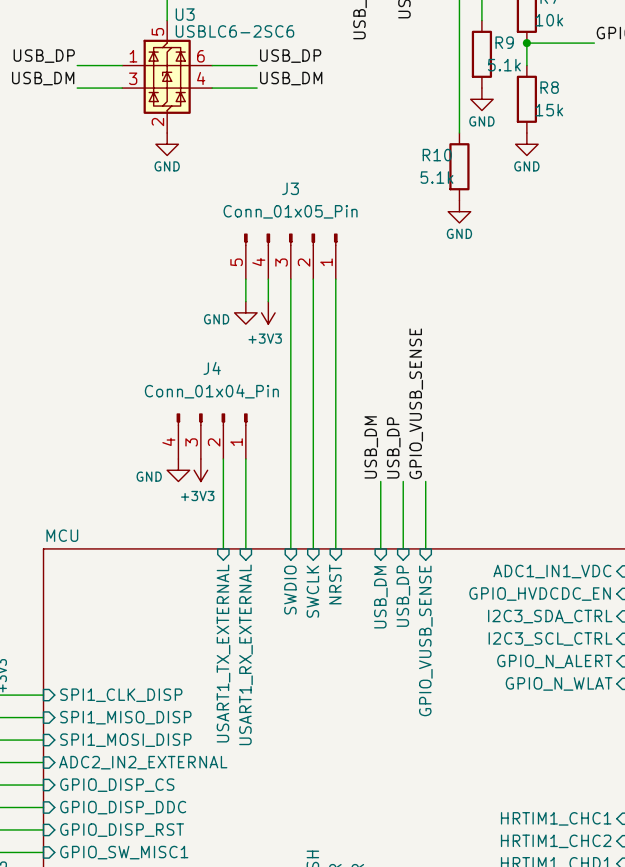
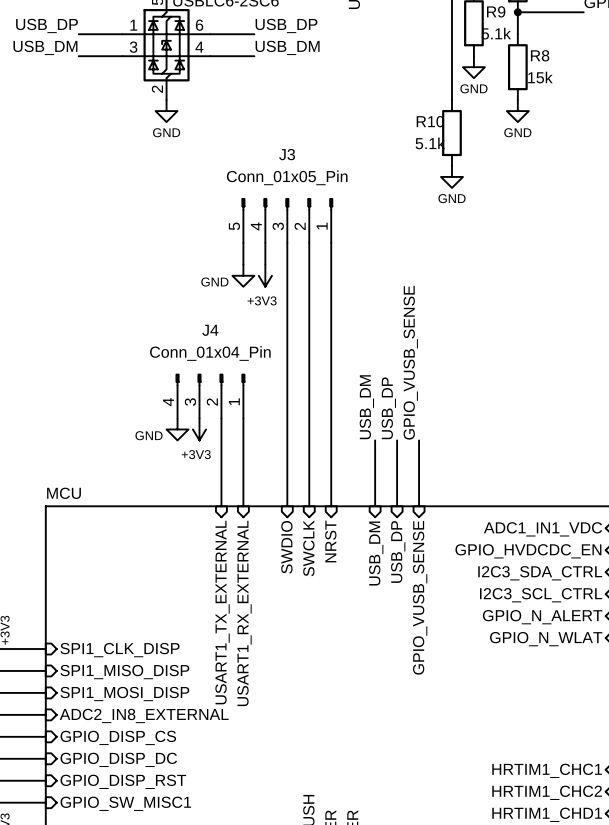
sheet pin: ADC2_IN2_EXTERNAL (143, 762) -> ADC2_IN8_EXTERNAL (144, 715)
sheet pin: GPIO_DISP_DDC (123, 807) -> GPIO_DISP_DC (118, 759)

